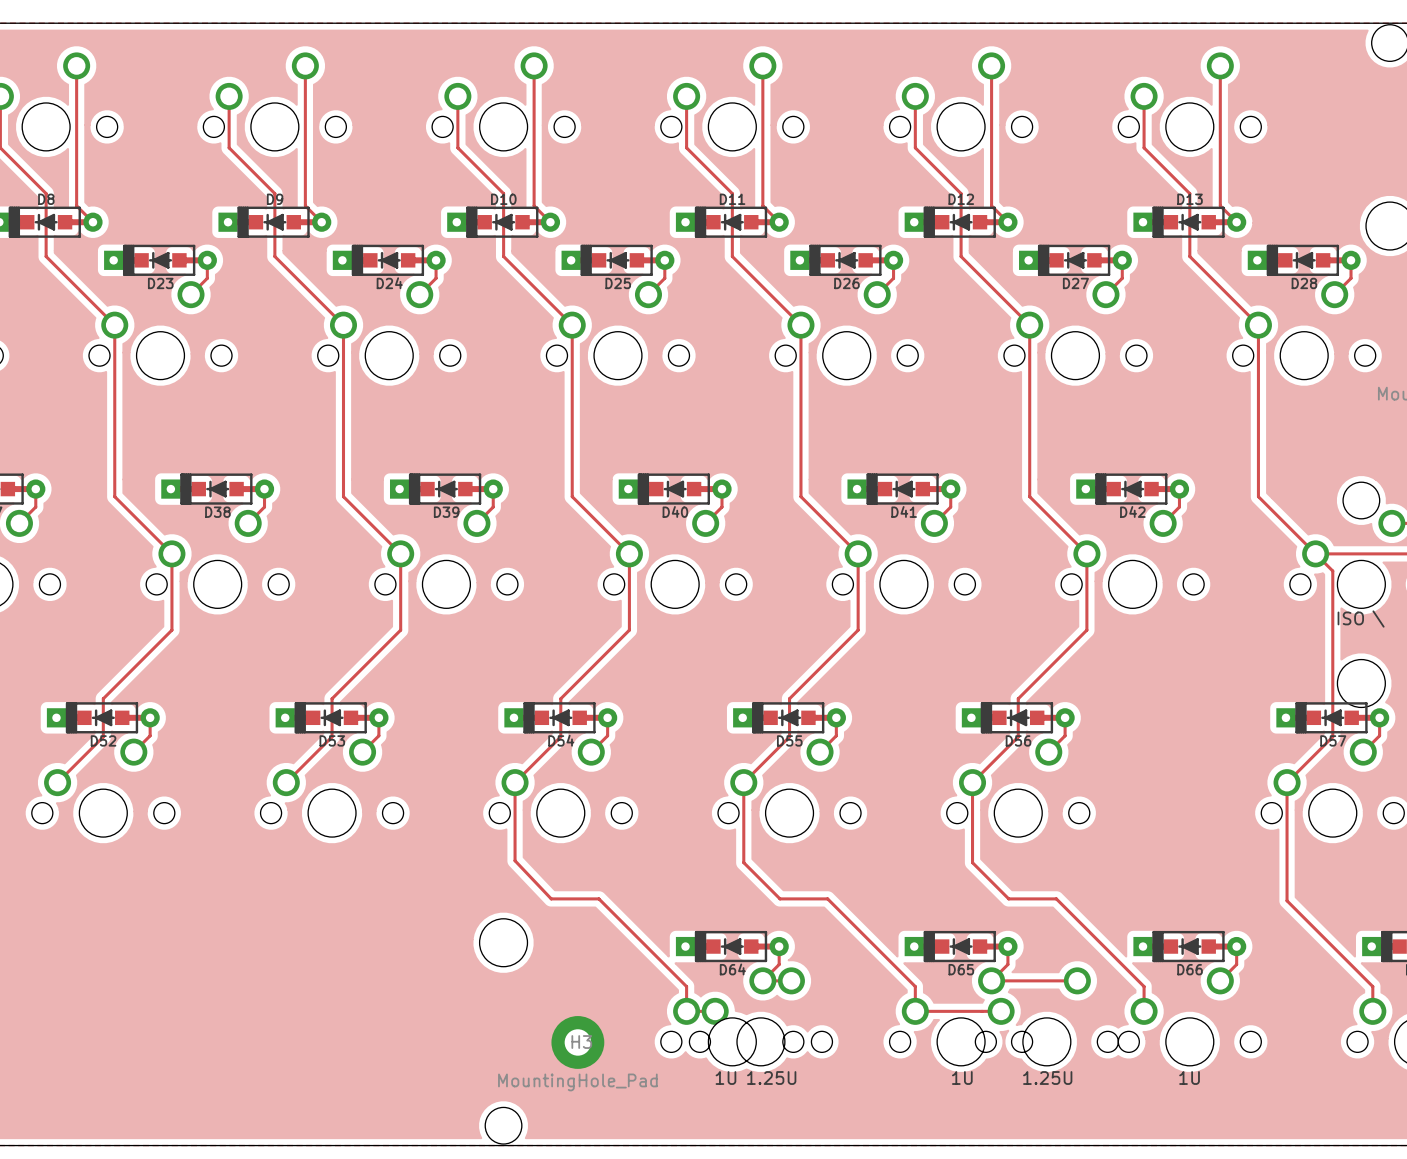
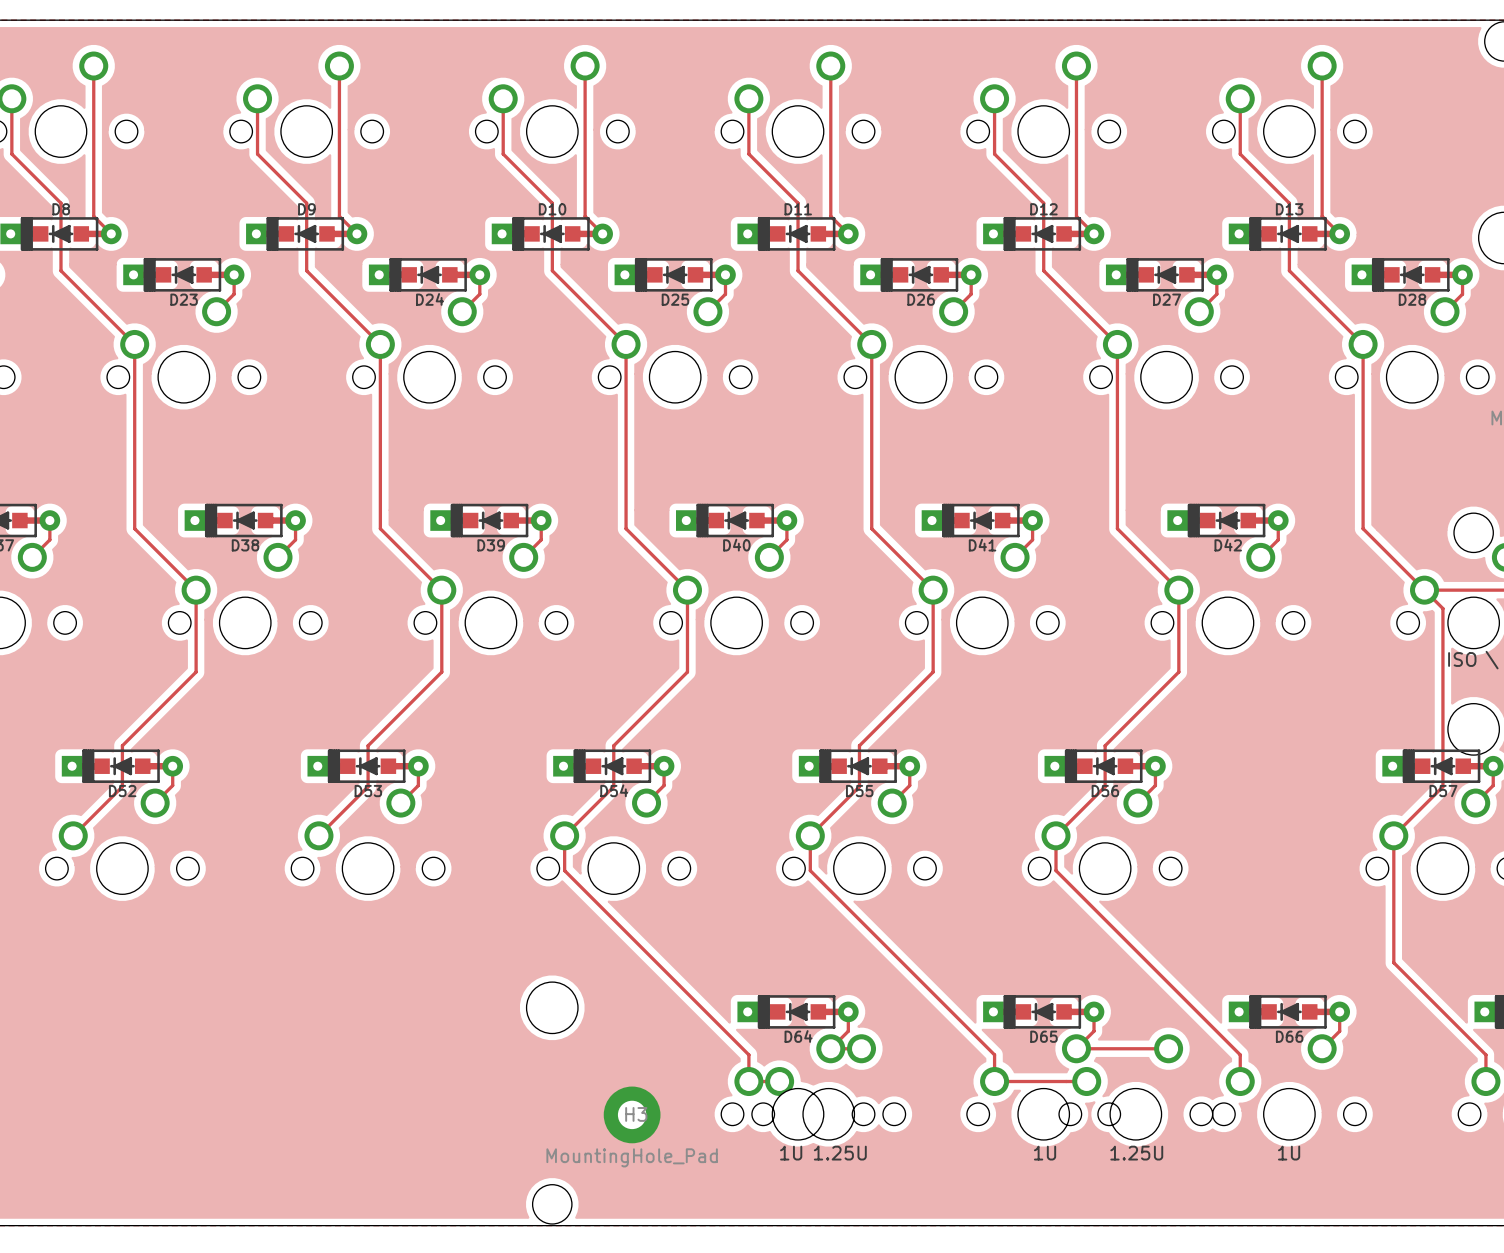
track: (515, 815) (515, 860) (551, 898) (598, 898) -> (564, 870) (654, 960)
track: (743, 815) (743, 862) (780, 898) (827, 898) -> (810, 870) (900, 960)
track: (972, 815) (972, 862) (1008, 898) (1056, 898) -> (1056, 870) (1146, 960)

